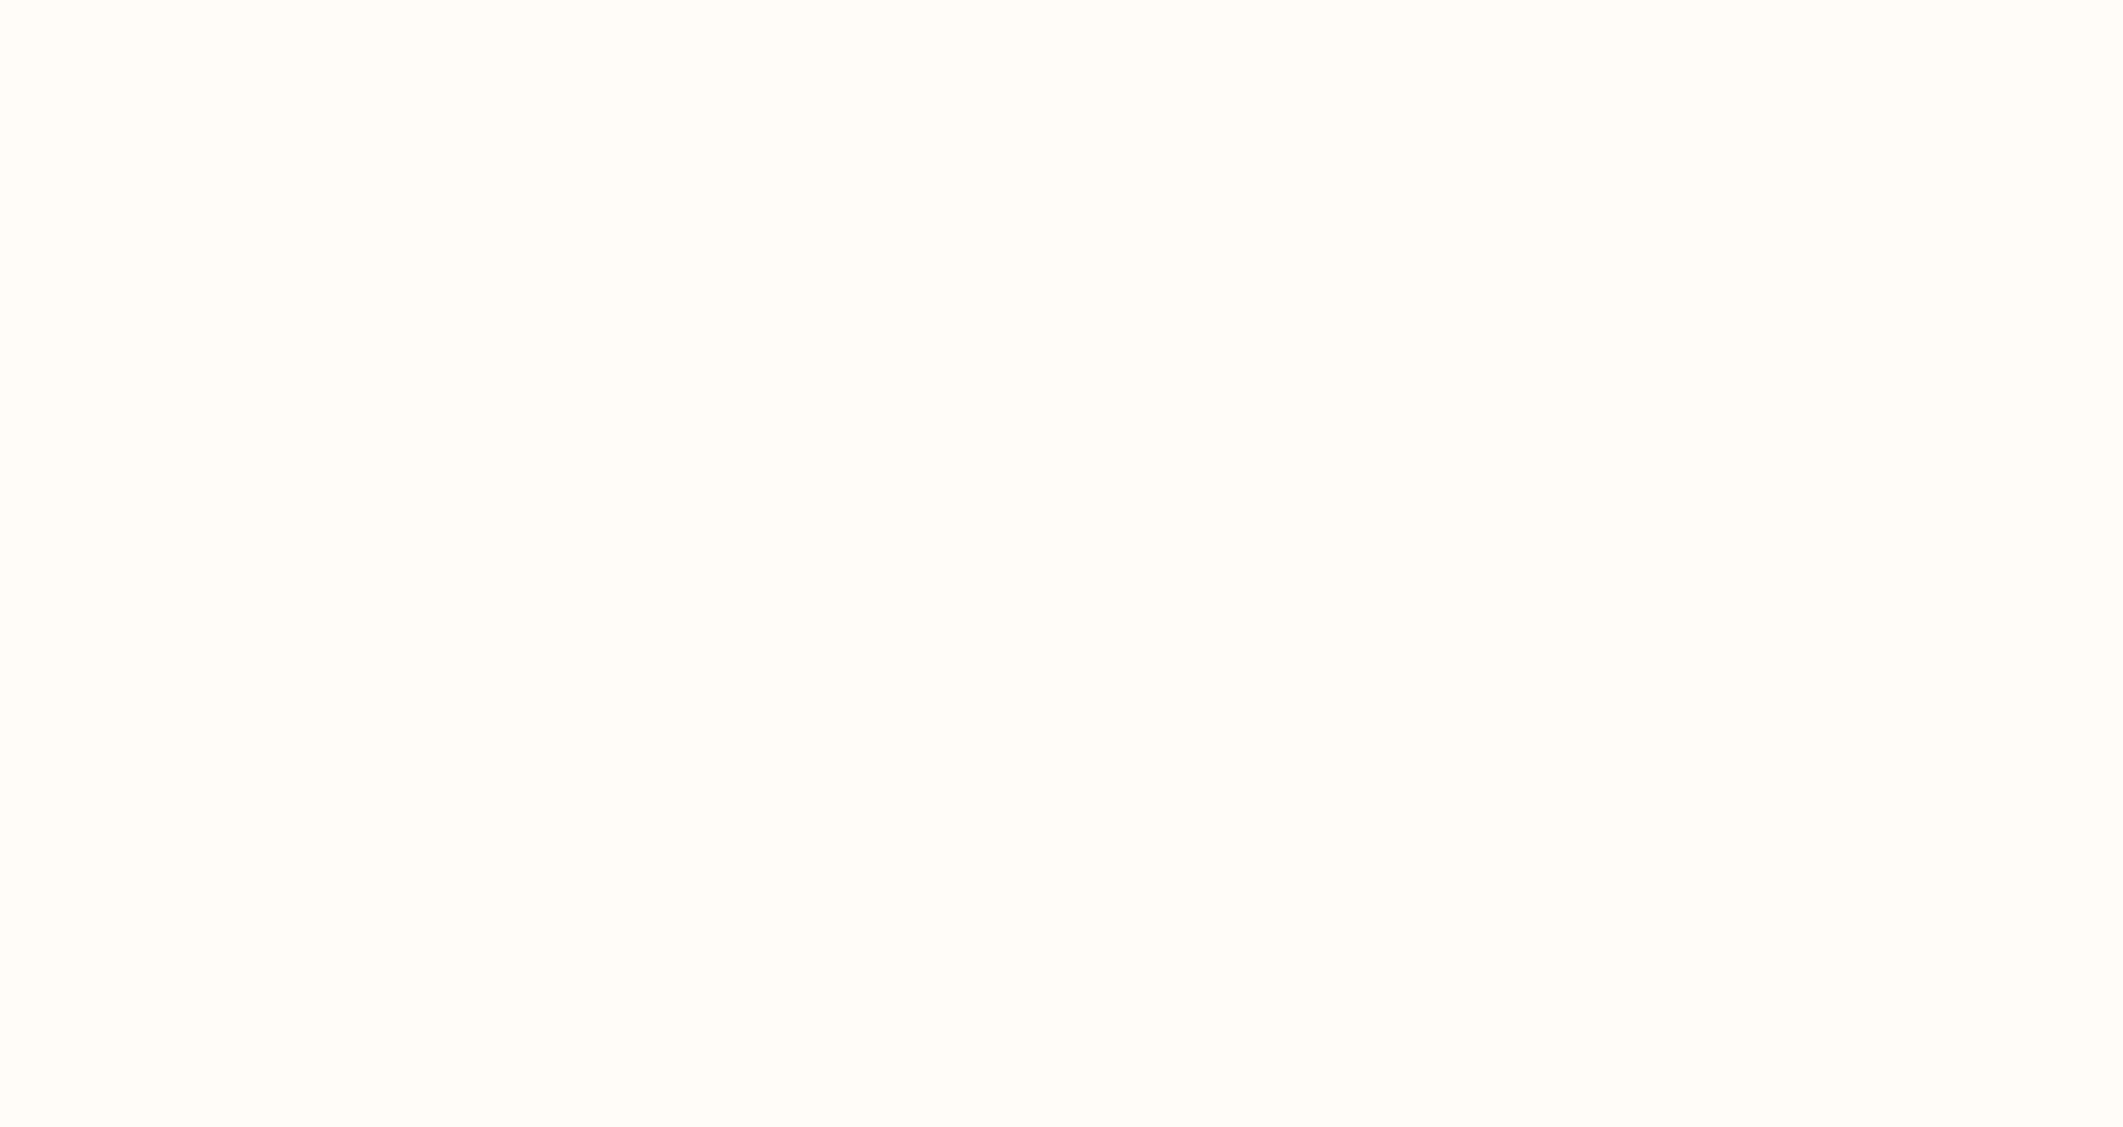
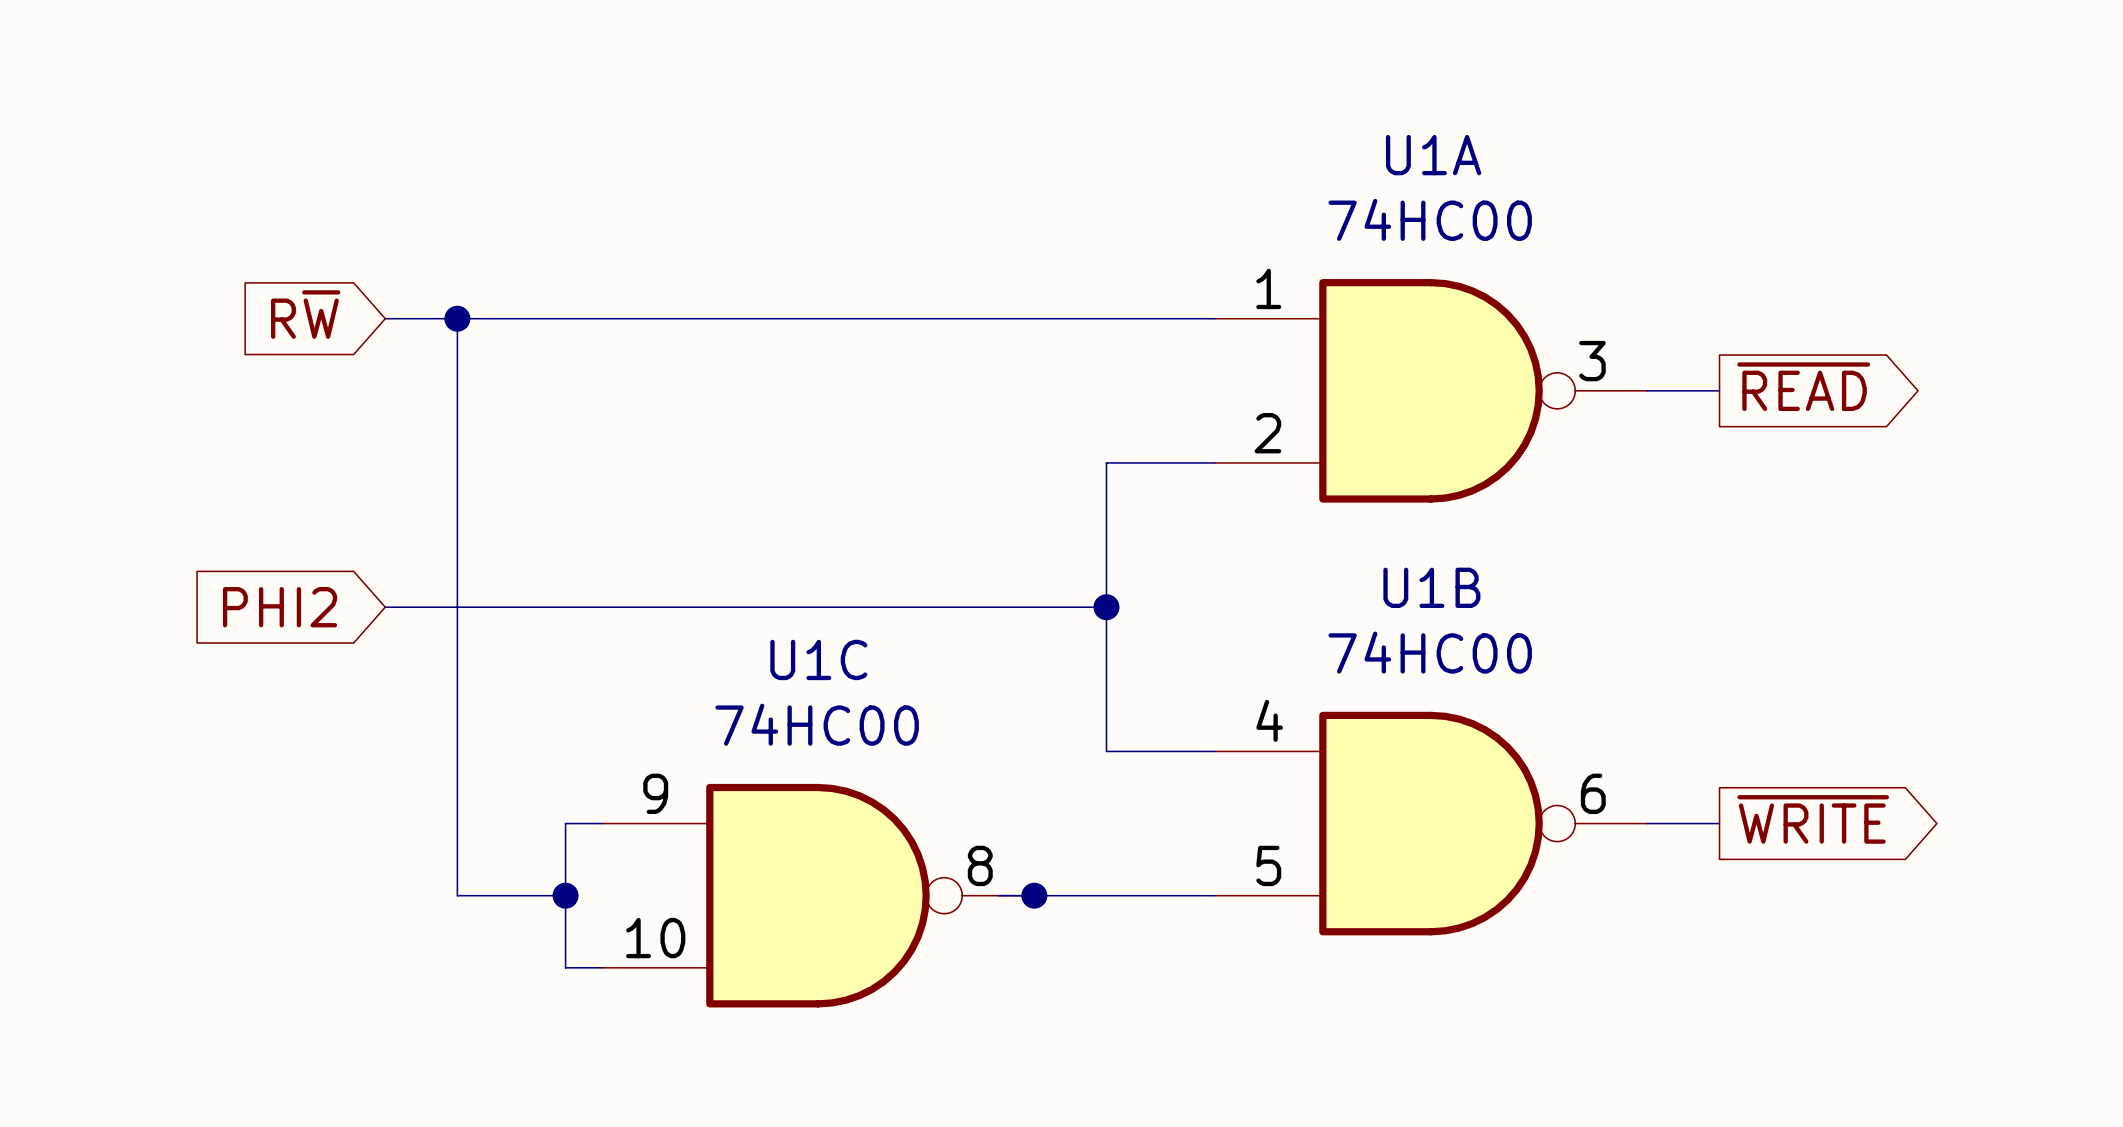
global label: none -> R~{W} (305, 314)
wire: none -> (385, 318) (1214, 318)
wire: none -> (457, 318) (457, 895) (565, 895)
junction: none -> (457, 318)
global label: none -> ~{READ} (1803, 386)
U1A: none -> 74HC00 (1431, 390)
wire: none -> (1647, 390) (1719, 390)
wire: none -> (1214, 462) (1106, 462) (1106, 751) (1214, 751)
global label: none -> PHI2 (280, 607)
wire: none -> (385, 607) (1106, 607)
junction: none -> (1106, 607)
global label: none -> ~{WRITE} (1813, 819)
wire: none -> (601, 823) (565, 823) (565, 967) (601, 967)
U1B: none -> 74HC00 (1431, 823)
wire: none -> (1647, 823) (1719, 823)
junction: none -> (565, 895)
U1C: none -> 74HC00 (817, 895)
wire: none -> (998, 895) (1214, 895)
junction: none -> (1034, 895)

